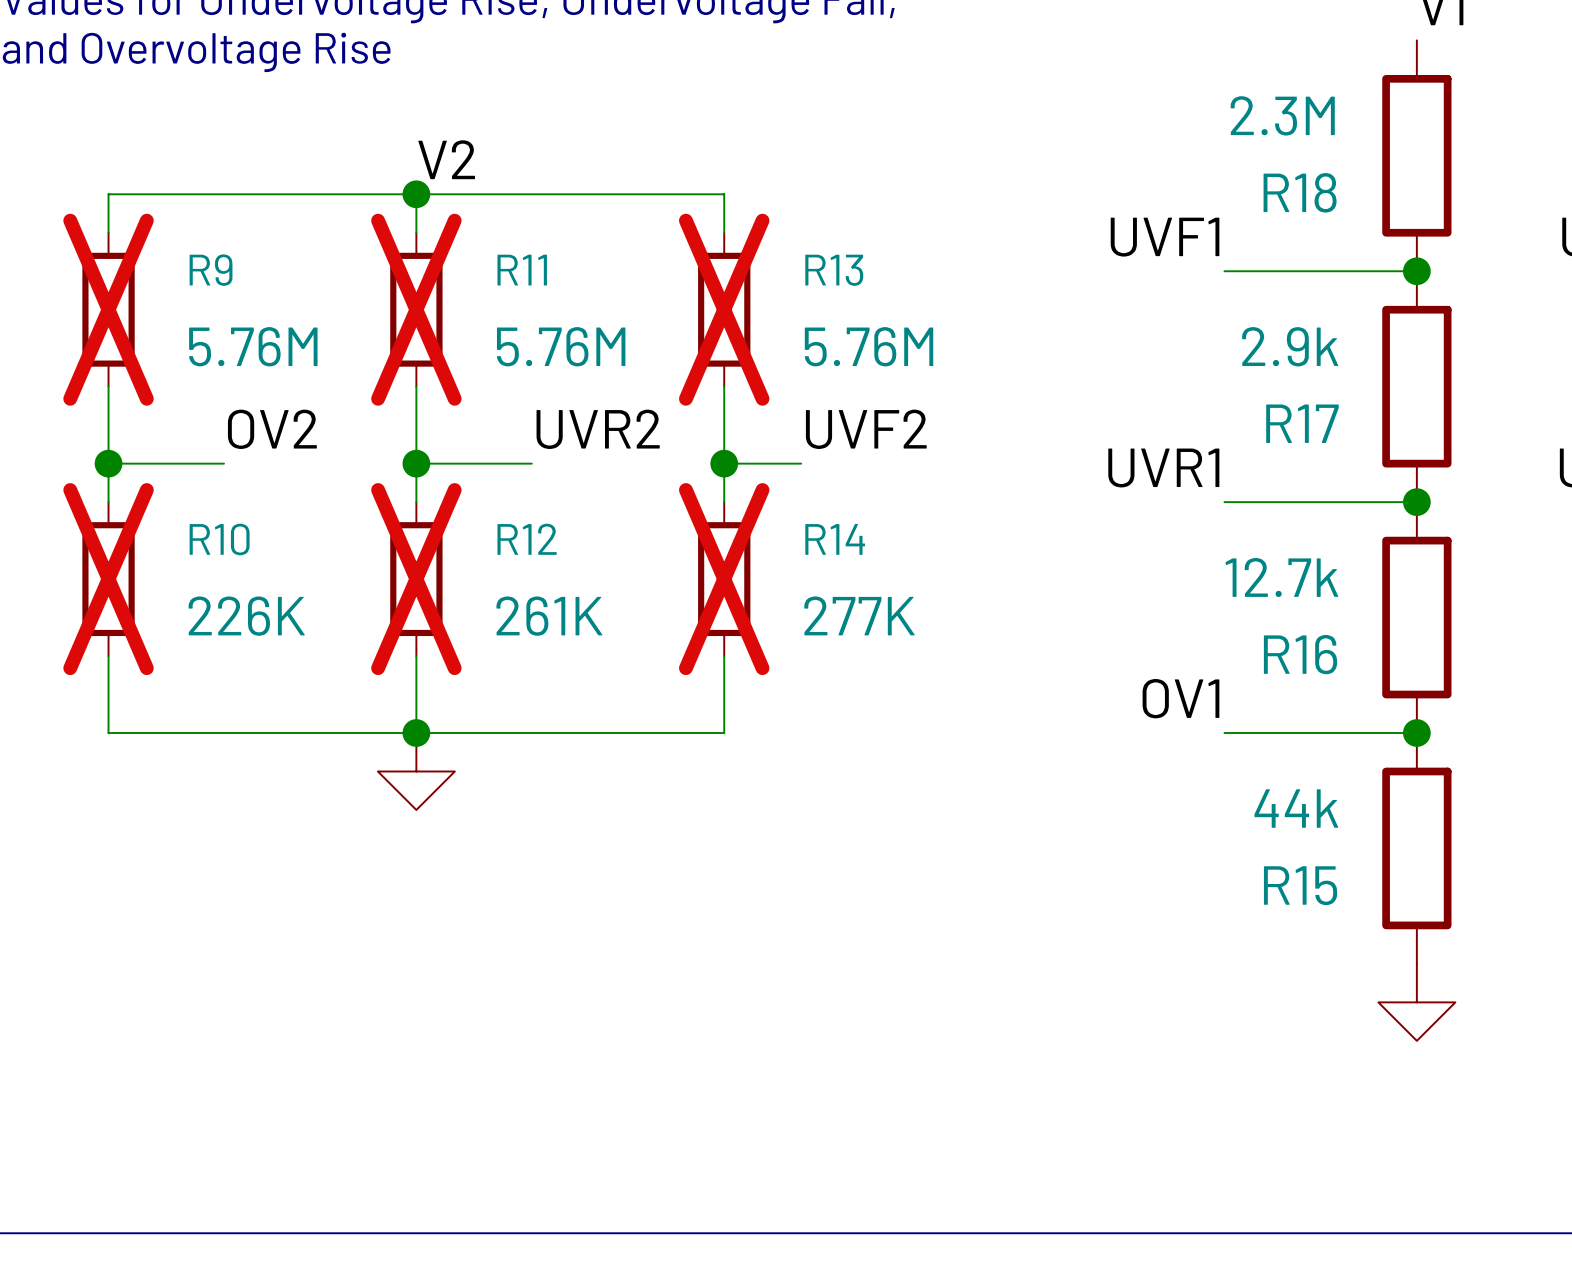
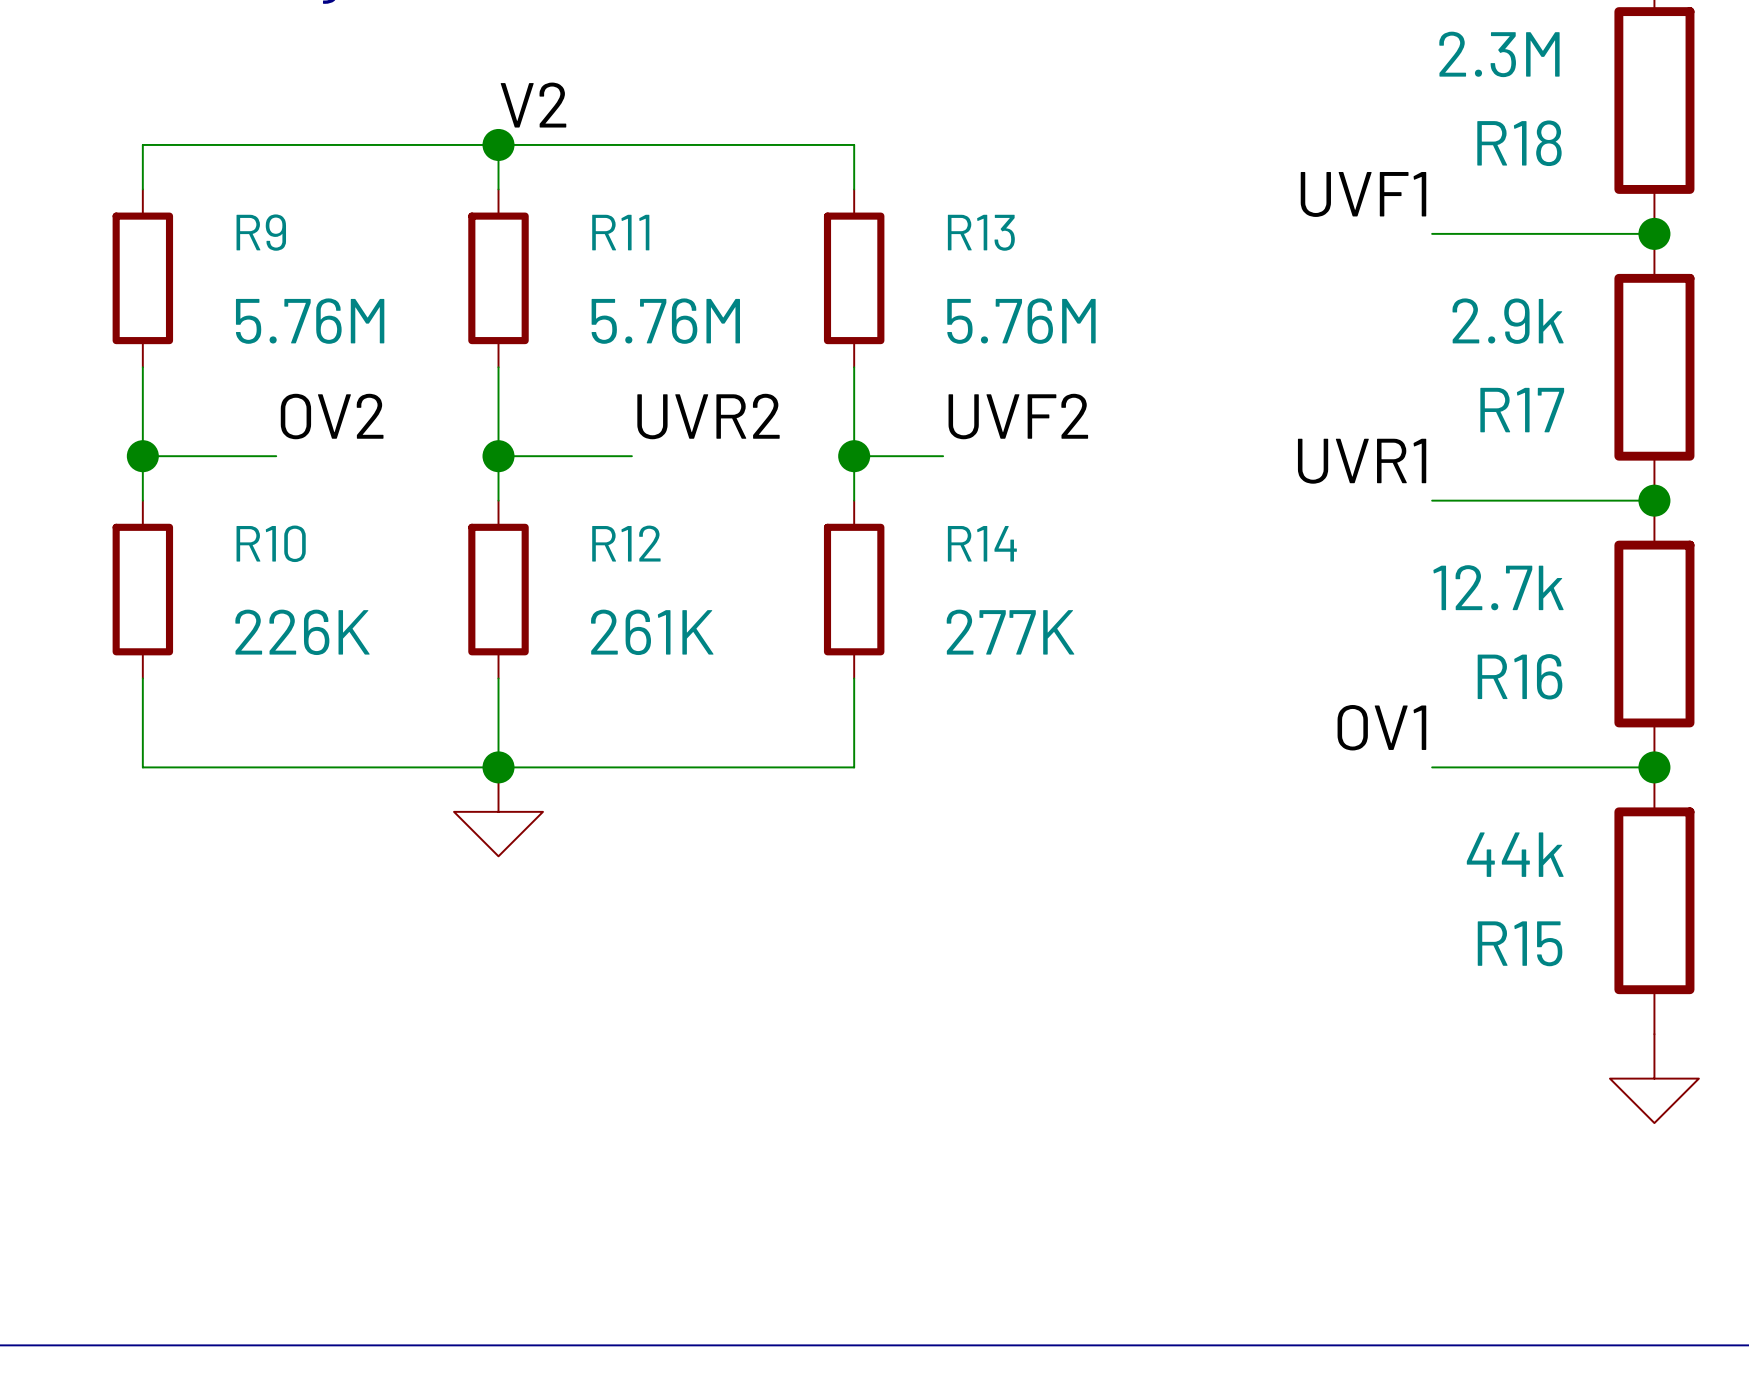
R9 do-not-place cross: (108, 309) -> none
R11 do-not-place cross: (416, 309) -> none
R13 do-not-place cross: (724, 309) -> none
R10 do-not-place cross: (108, 579) -> none
R12 do-not-place cross: (416, 579) -> none
R14 do-not-place cross: (724, 579) -> none

